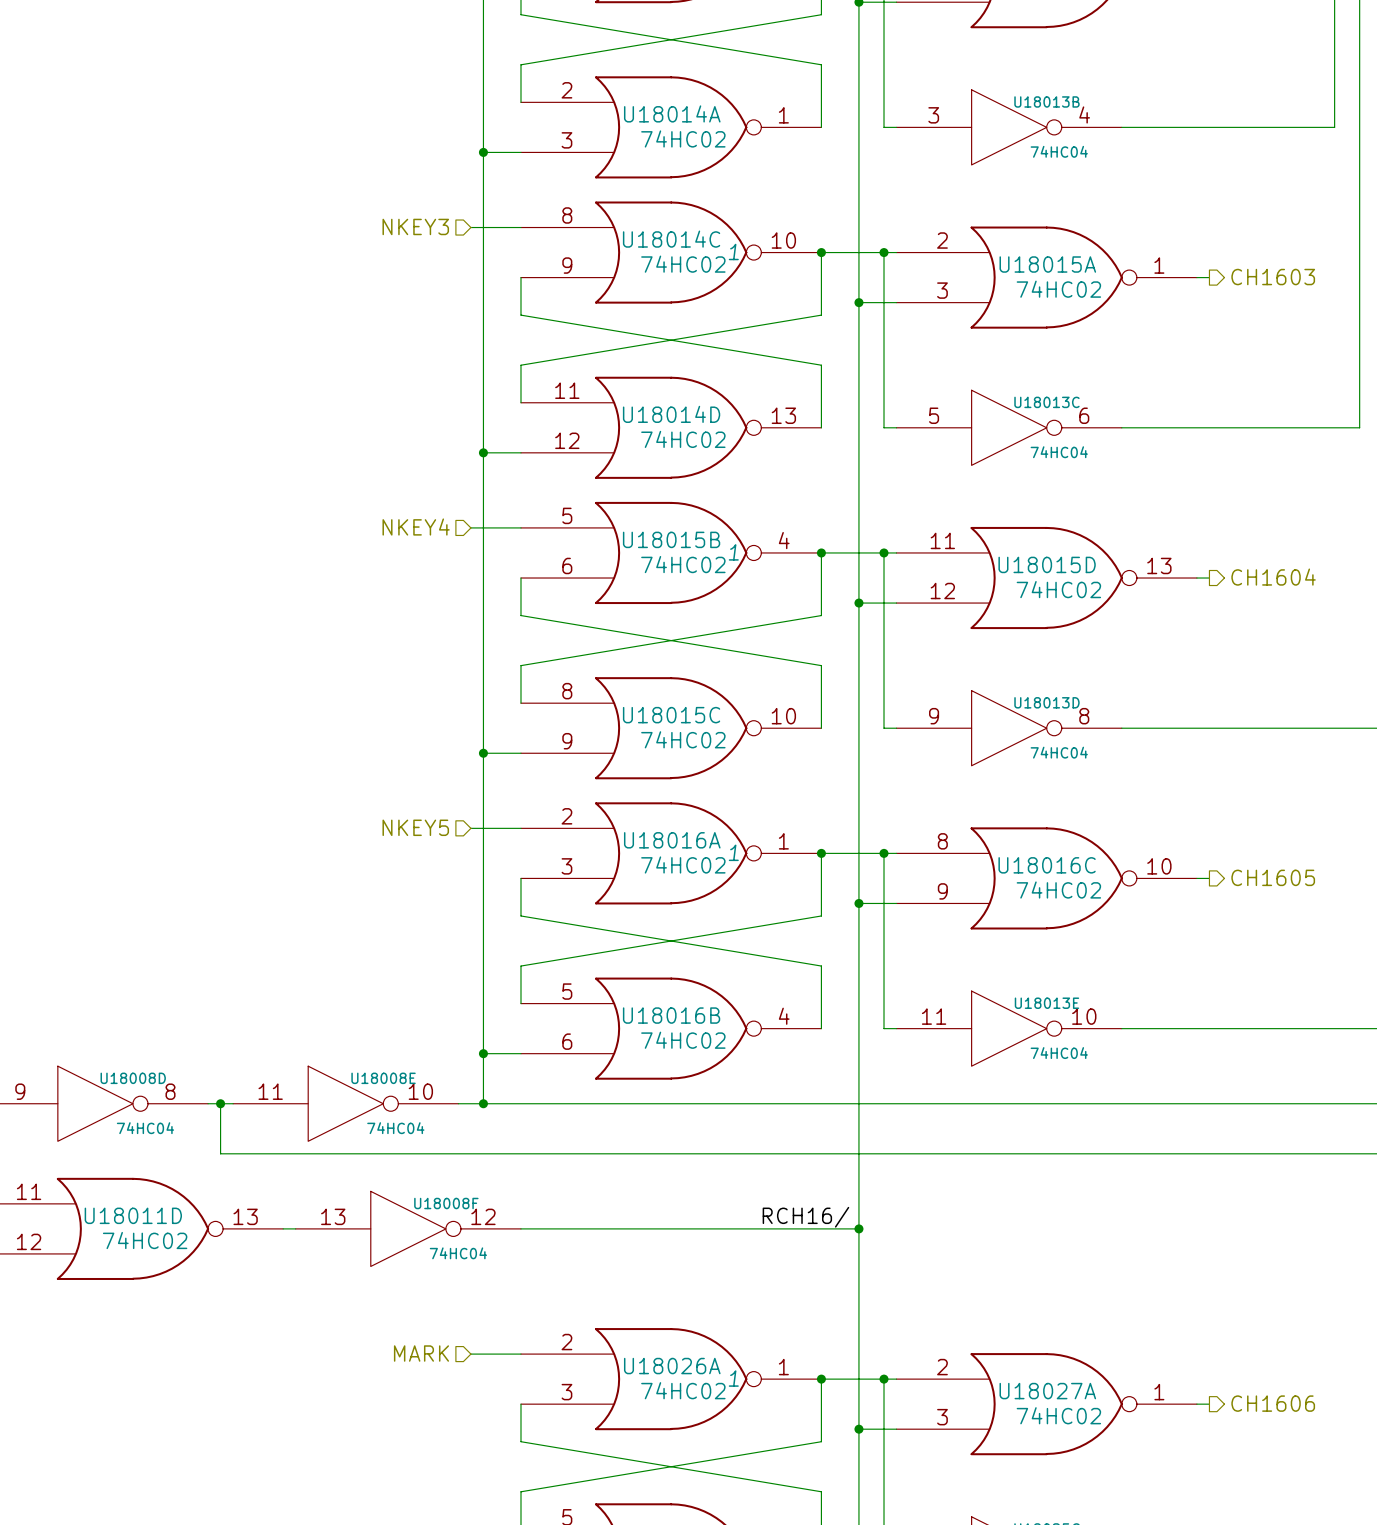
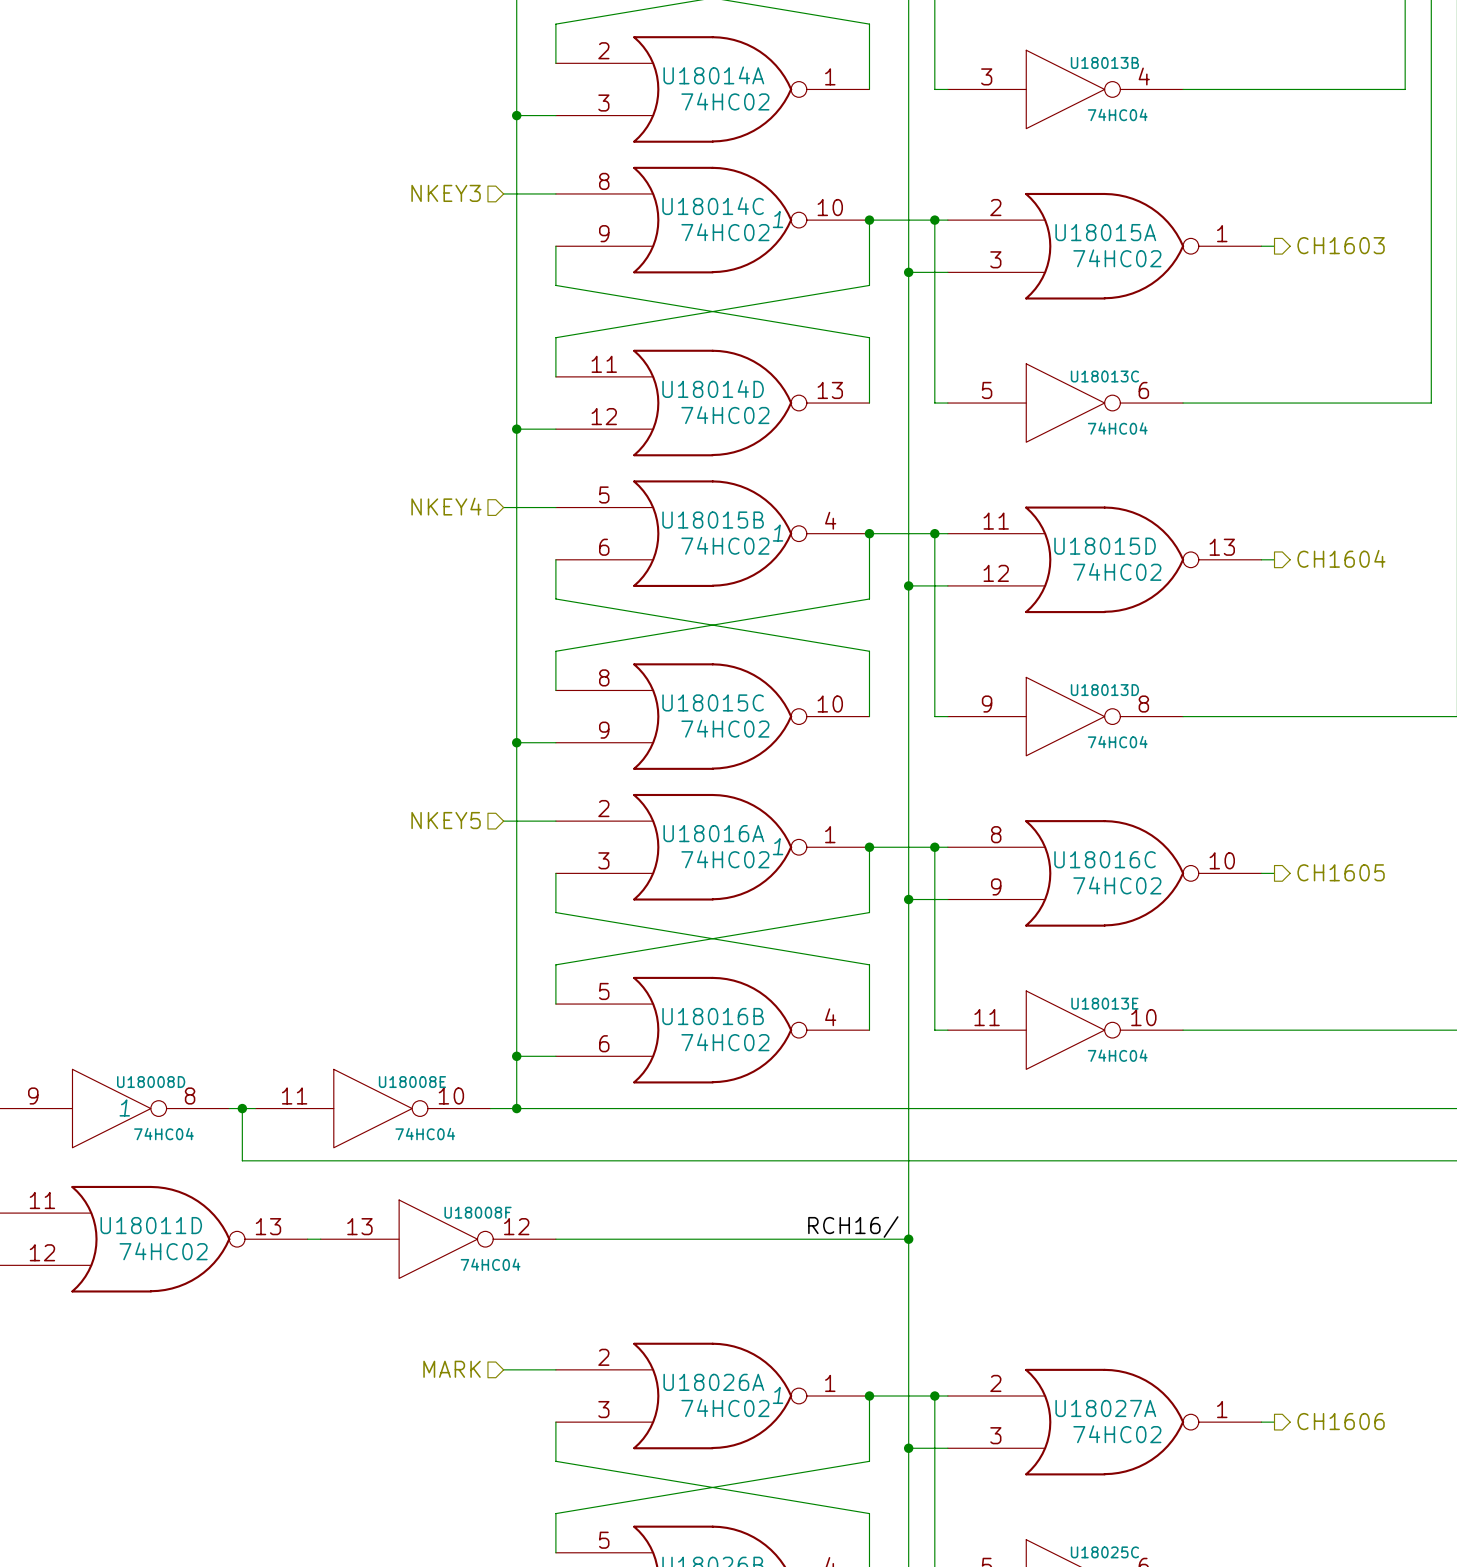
U18008D text: none -> 1 (124, 1107)

